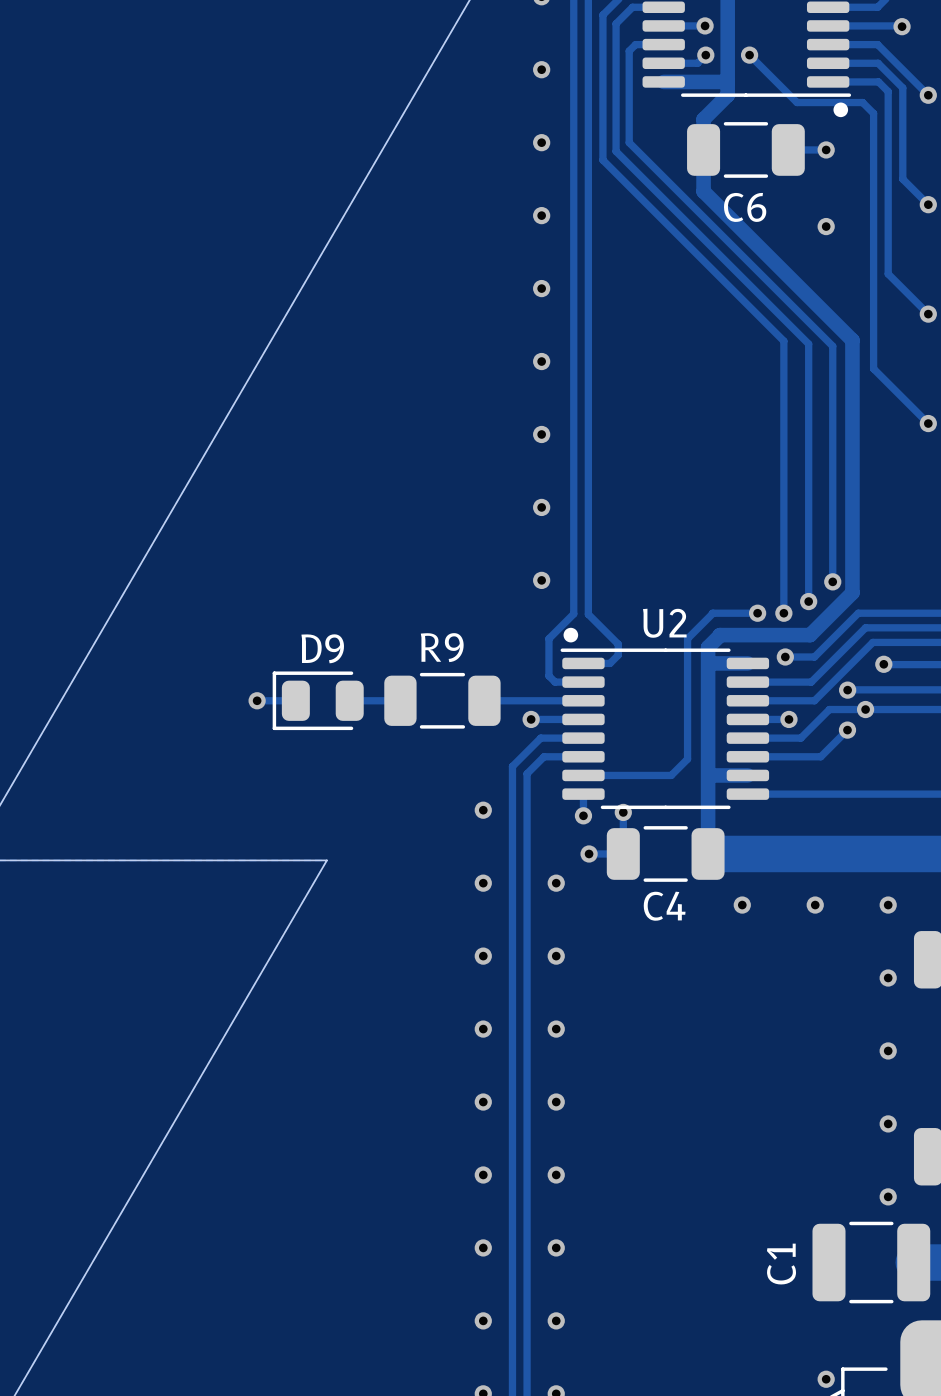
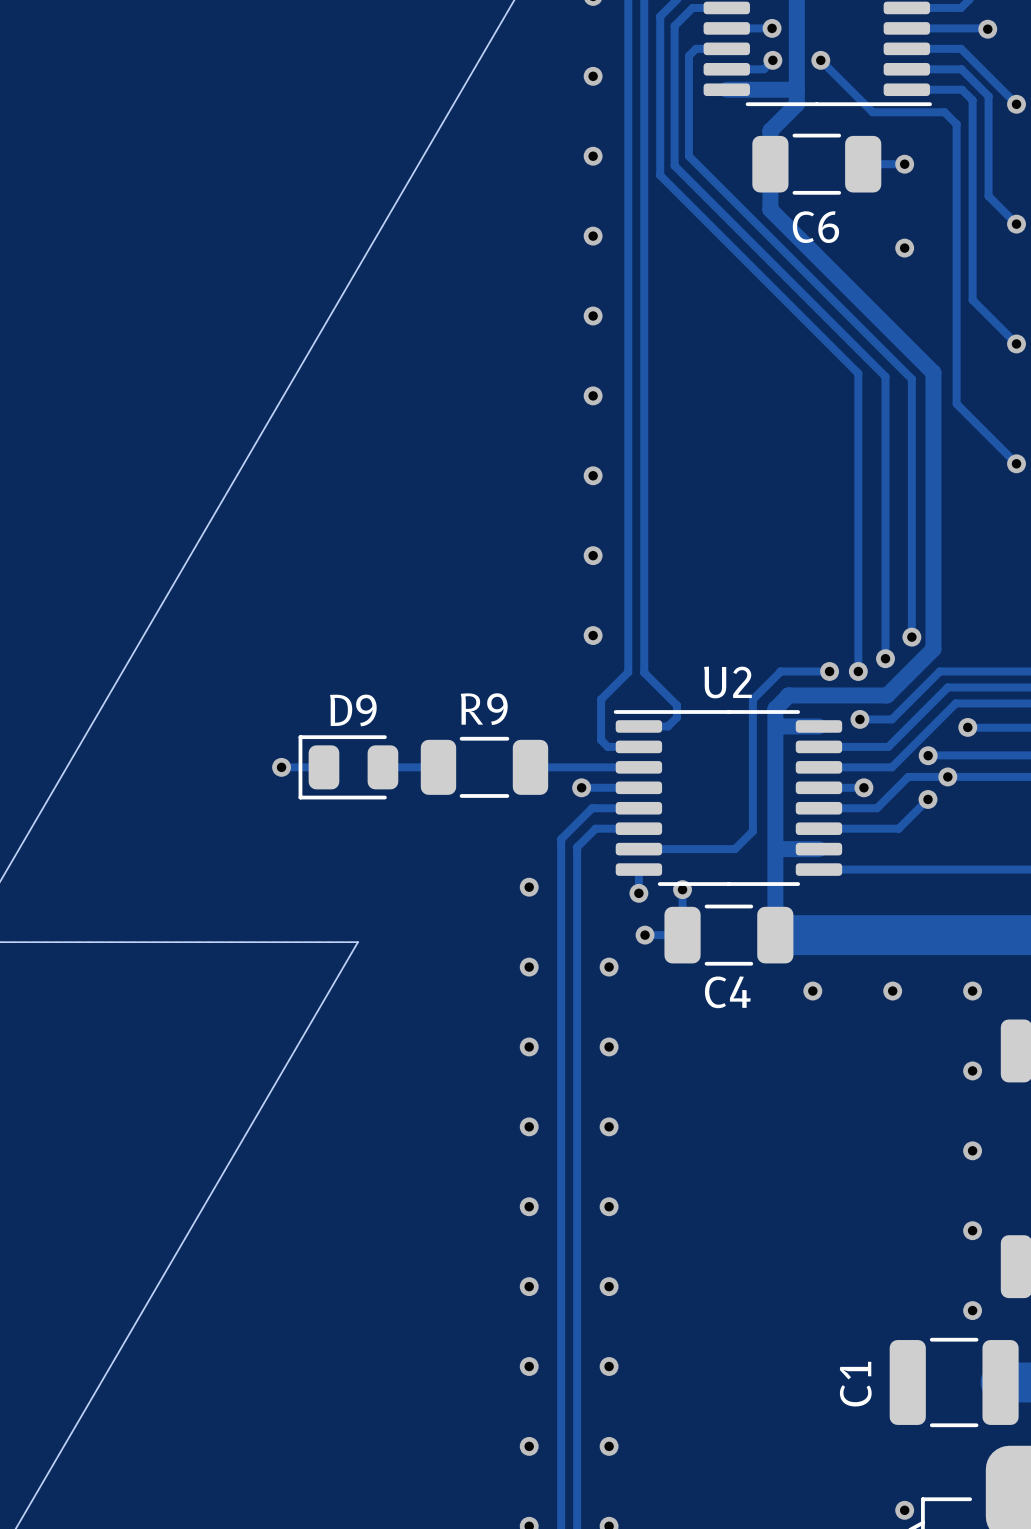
drawing: [833, 102, 849, 118] -> none
drawing: [563, 627, 579, 643] -> none

